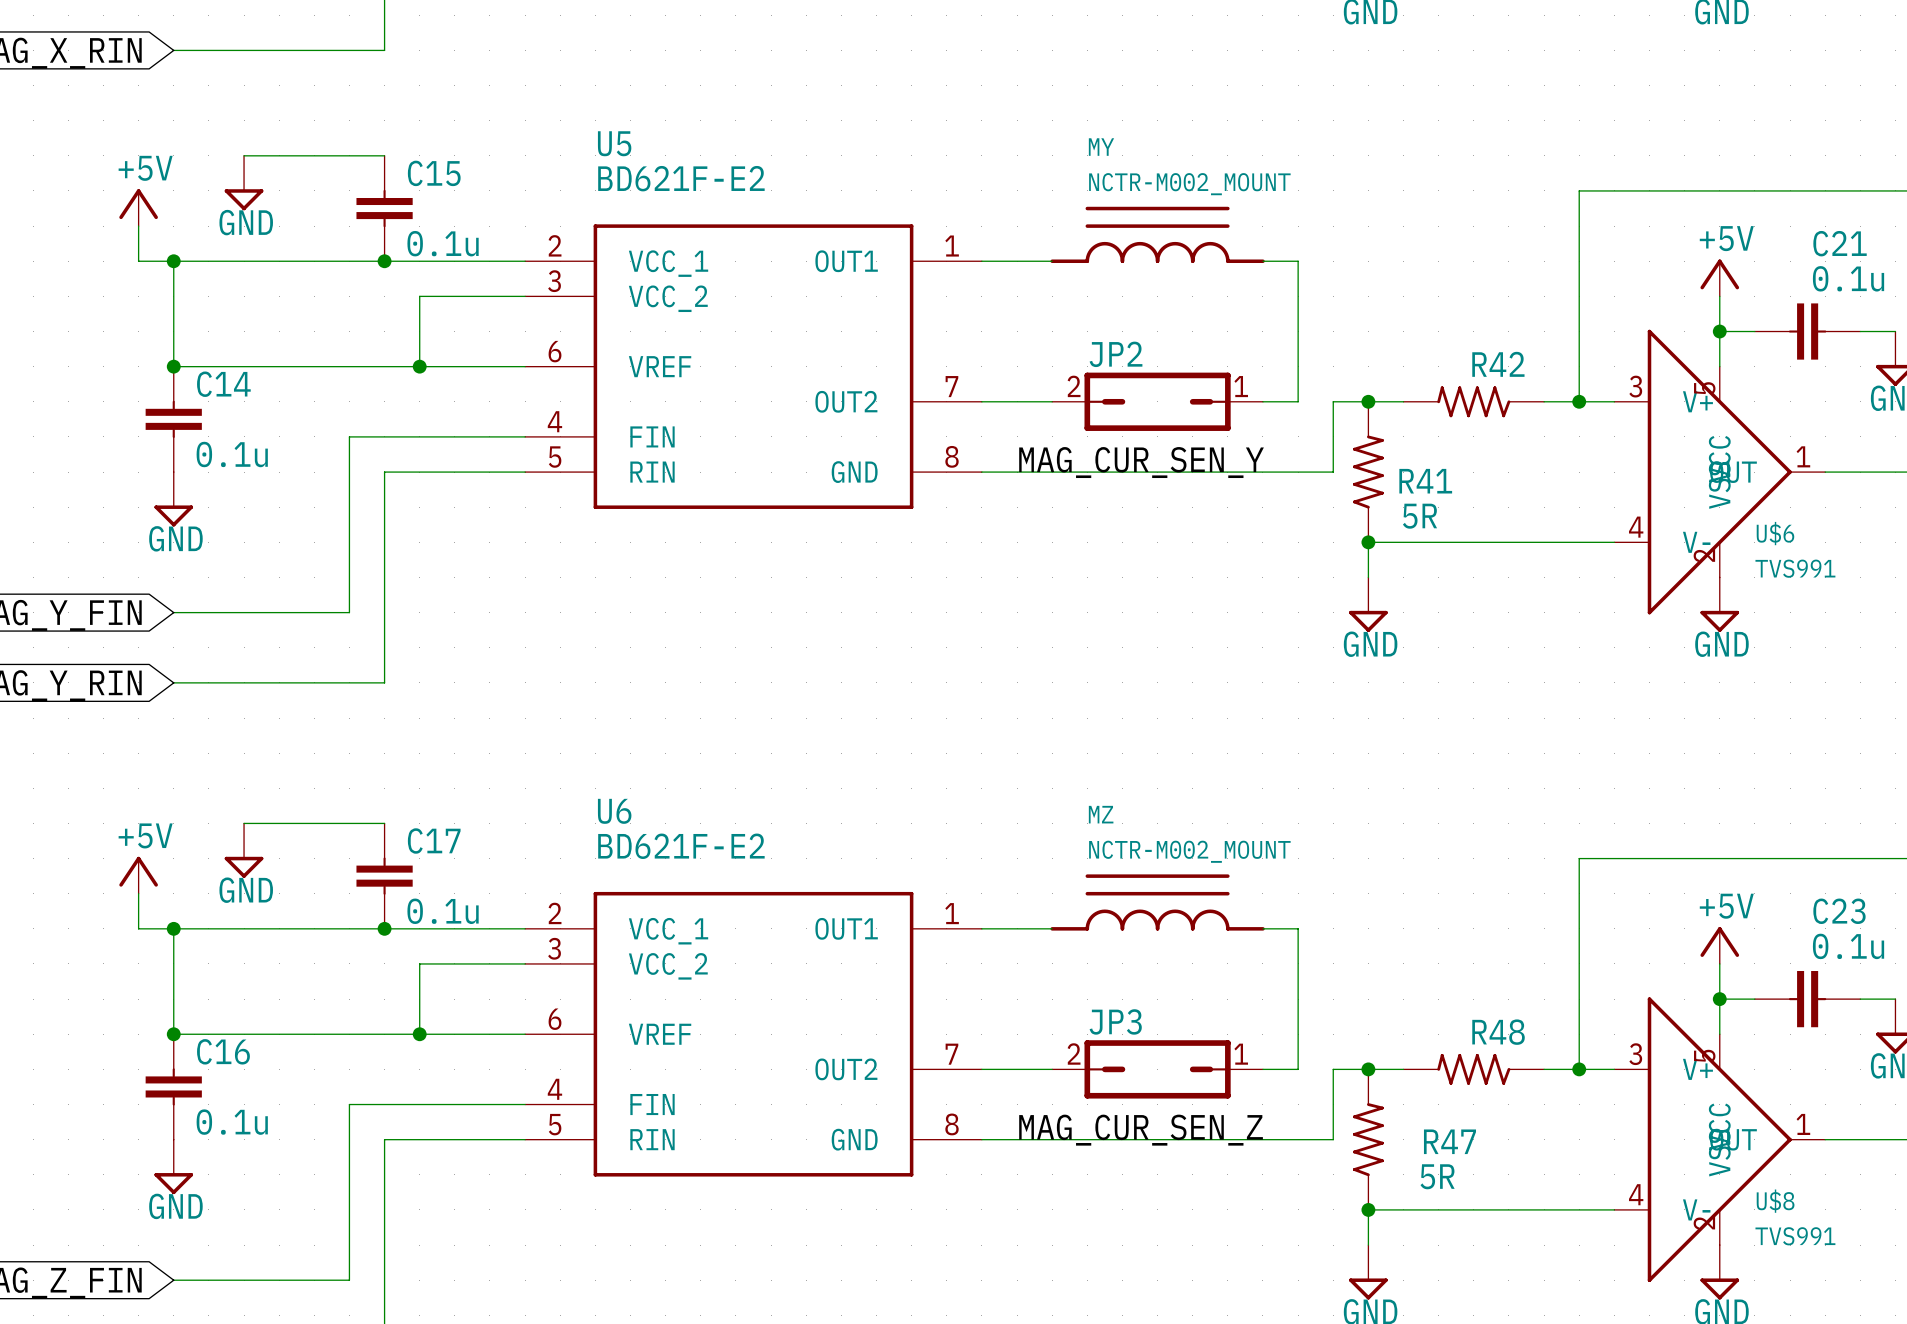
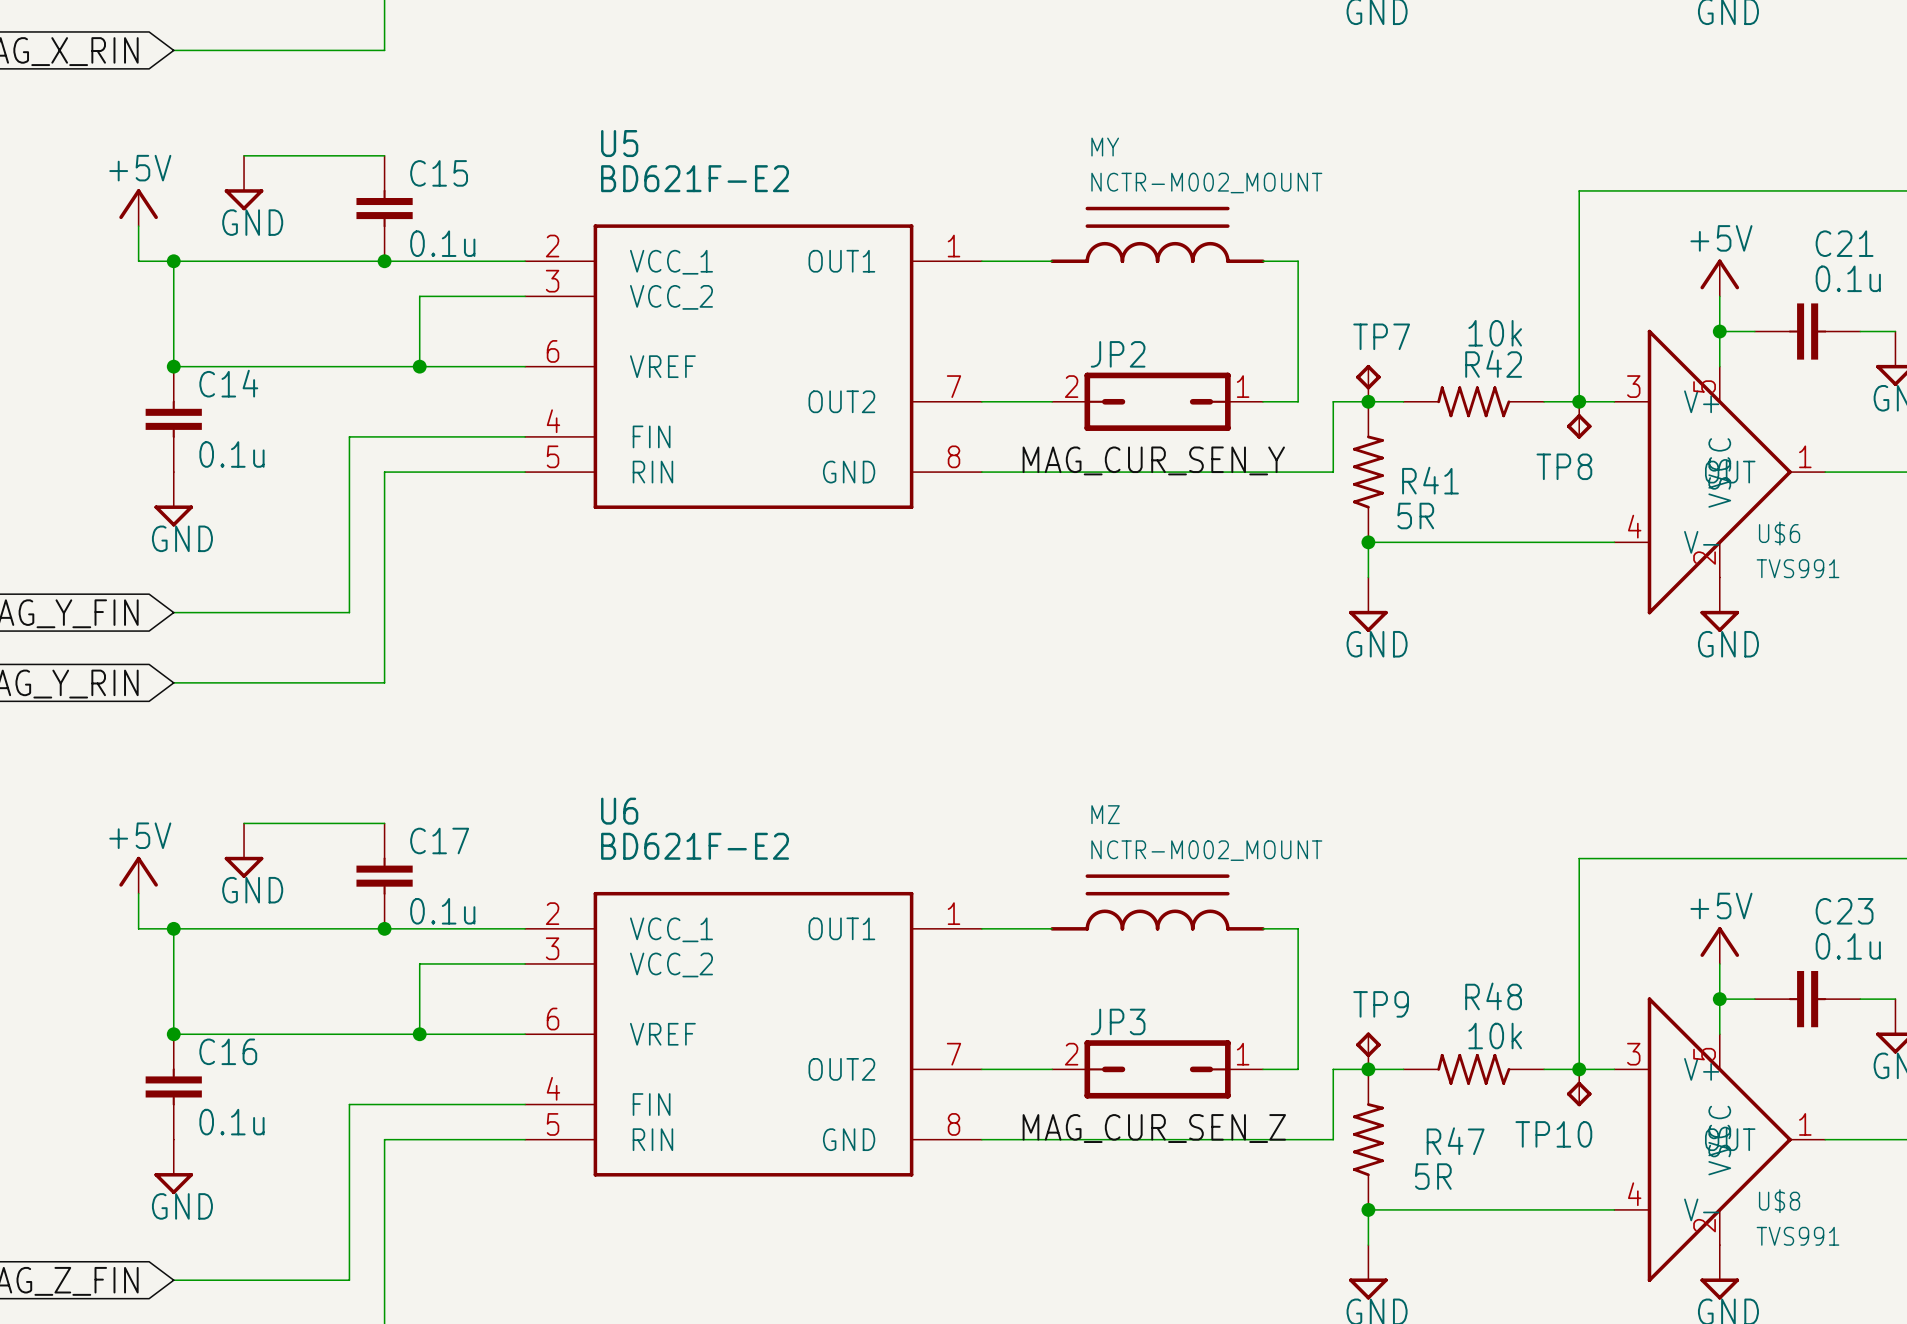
R42 value: none -> 10k (1495, 333)
TP7: none -> (1368, 383)
TP8: none -> (1579, 420)
R48 name position: R48 (1498, 1032) -> R48 (1493, 996)
R48 value: none -> 10k (1495, 1036)
TP9: none -> (1368, 1050)
TP10: none -> (1579, 1087)

